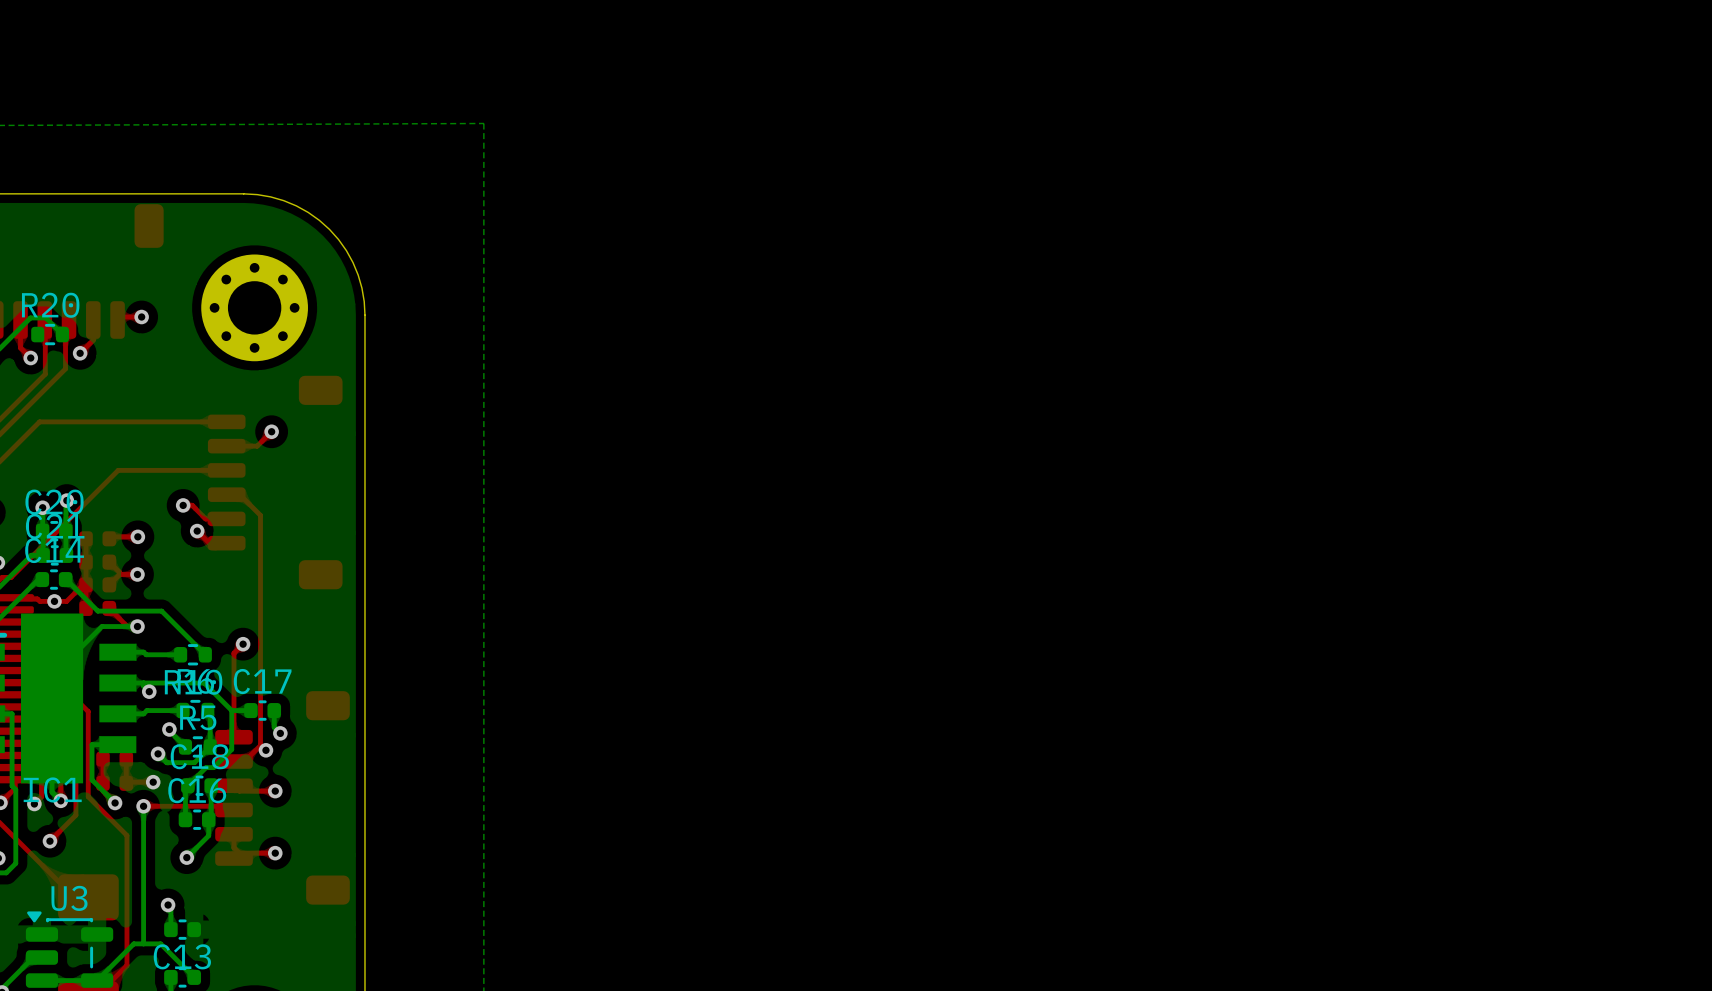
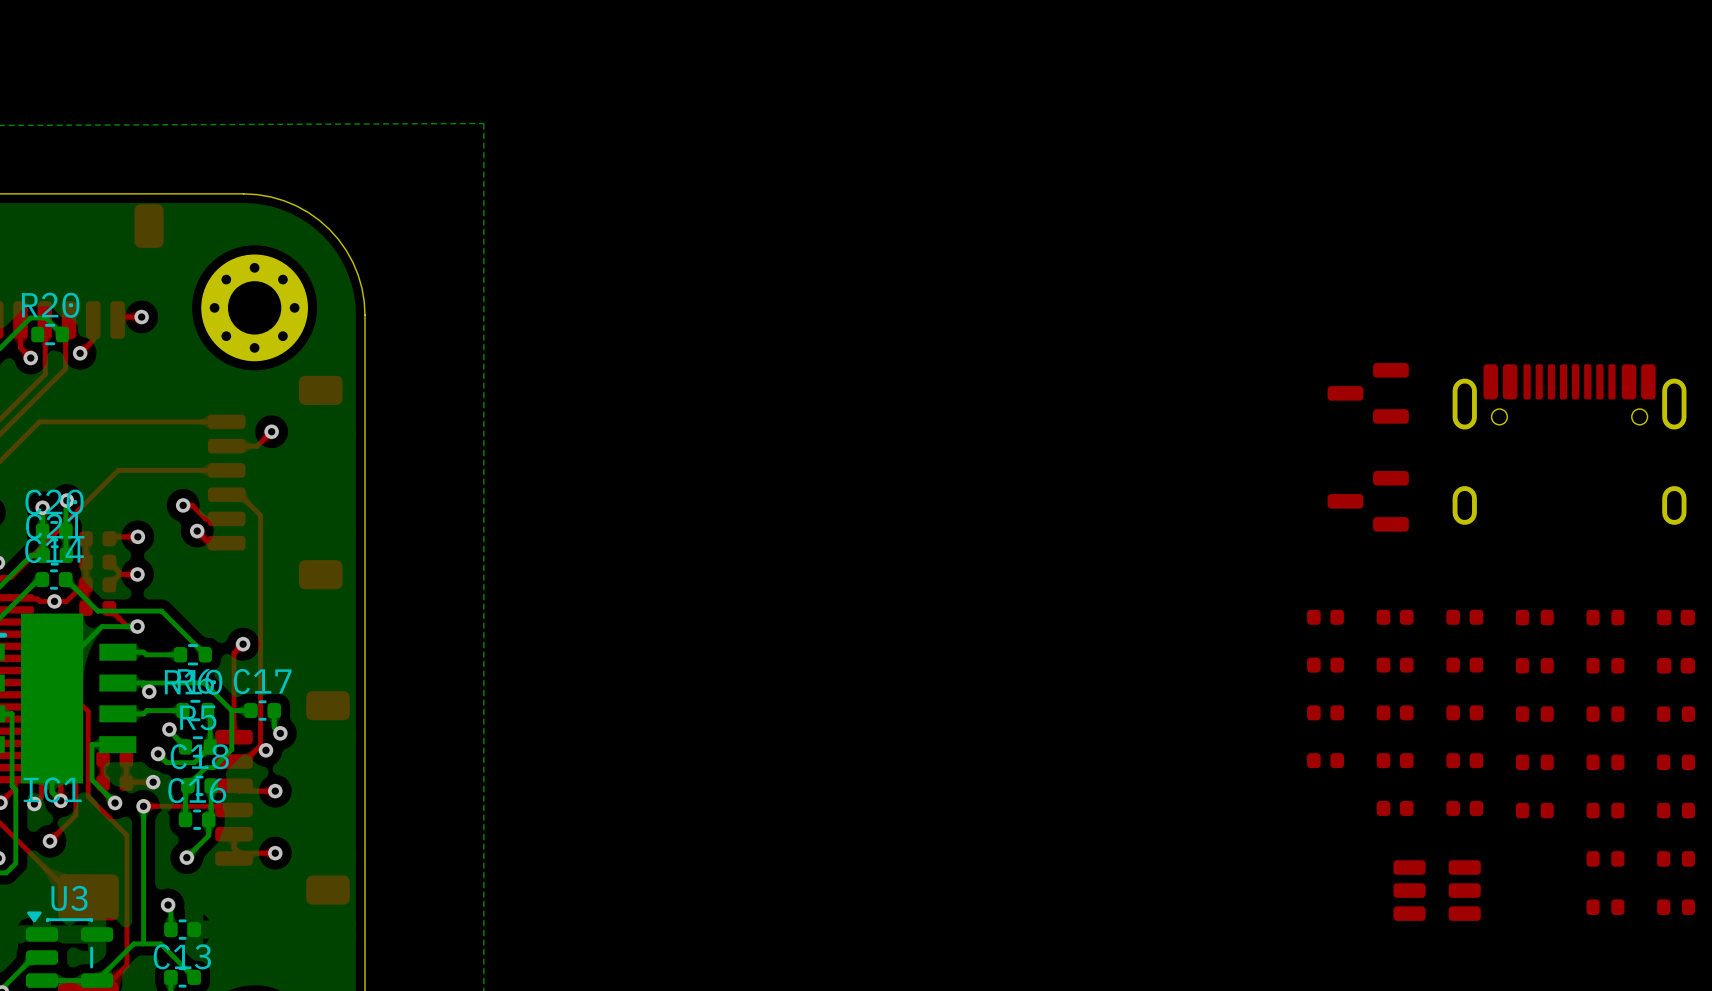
part: none -> (1368, 393)
part: none -> (1569, 444)
part: none -> (1368, 501)
part: none -> (1325, 617)
part: none -> (1395, 617)
part: none -> (1464, 617)
part: none -> (1534, 617)
part: none -> (1605, 617)
part: none -> (1676, 617)
part: none -> (1325, 665)
part: none -> (1395, 665)
part: none -> (1464, 665)
part: none -> (1534, 665)
part: none -> (1605, 665)
part: none -> (1676, 665)
part: none -> (1325, 712)
part: none -> (1395, 712)
part: none -> (1464, 712)
part: none -> (1534, 714)
part: none -> (1605, 714)
part: none -> (1676, 714)
part: none -> (1325, 760)
part: none -> (1395, 760)
part: none -> (1464, 760)
part: none -> (1534, 762)
part: none -> (1605, 762)
part: none -> (1676, 762)
part: none -> (1395, 808)
part: none -> (1464, 808)
part: none -> (1534, 810)
part: none -> (1605, 810)
part: none -> (1676, 810)
part: none -> (1605, 858)
part: none -> (1676, 858)
part: none -> (1437, 890)
part: none -> (1605, 907)
part: none -> (1676, 907)

